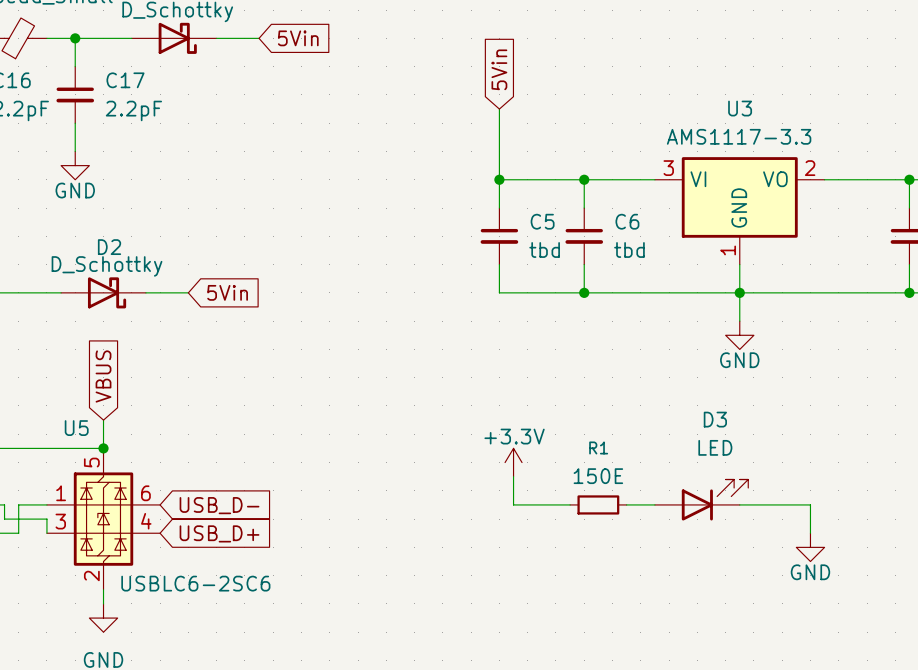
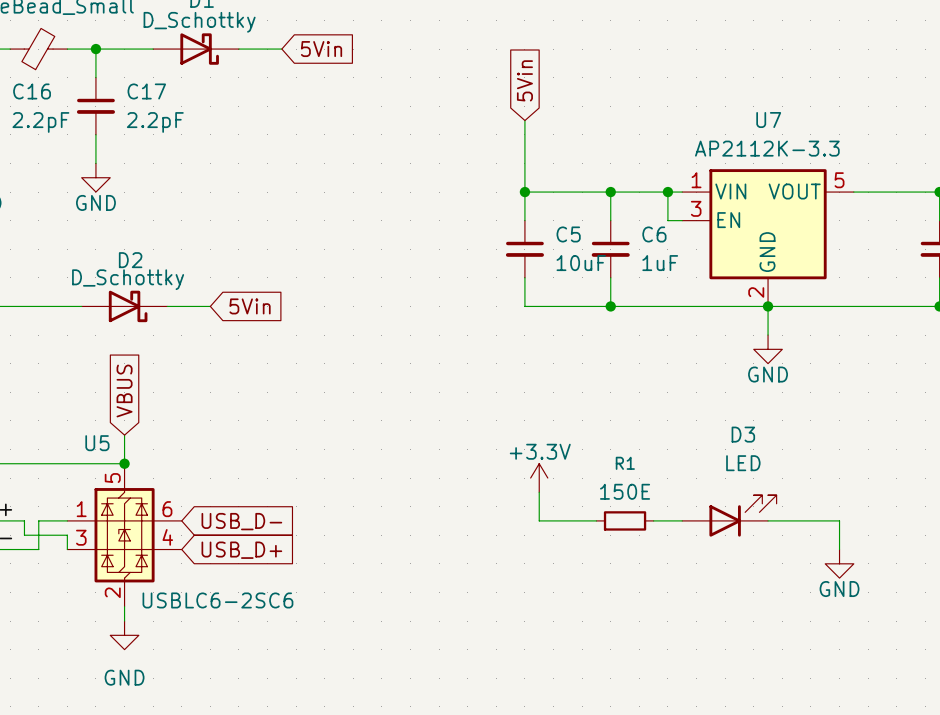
wire: none -> (667, 192) (667, 220) (682, 220)
junction: none -> (667, 192)
U3: AMS1117-3.3 (739, 210) -> none
U7: none -> AP2112K-3.3 (768, 237)
C5 value: tbd (544, 249) -> 10uF (581, 263)
C6 value: tbd (629, 249) -> 1uF (660, 263)

